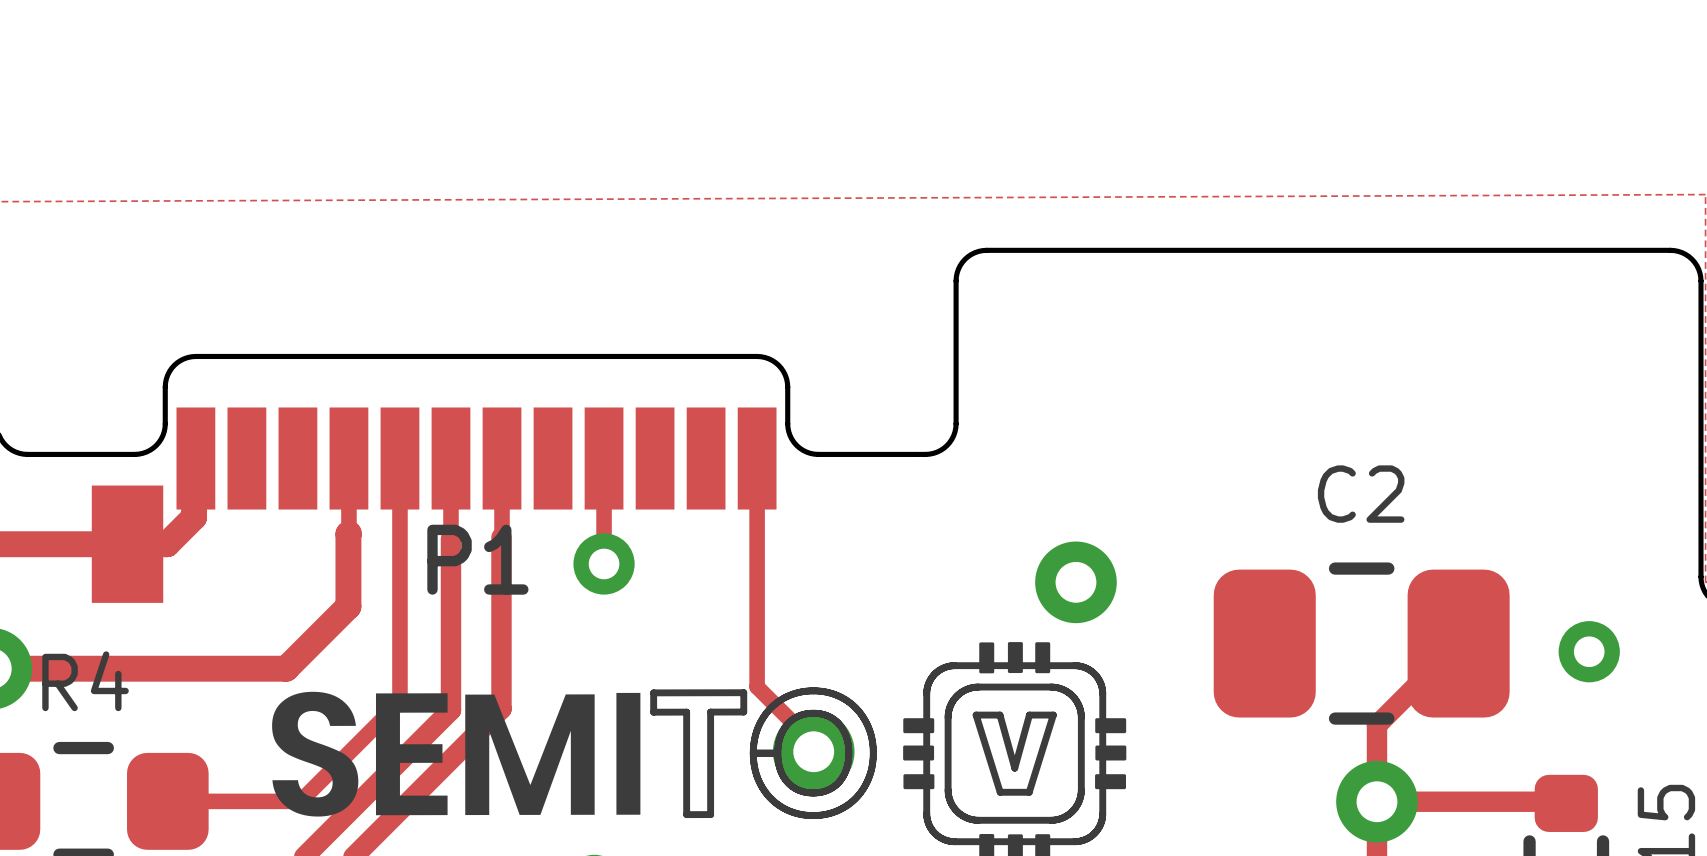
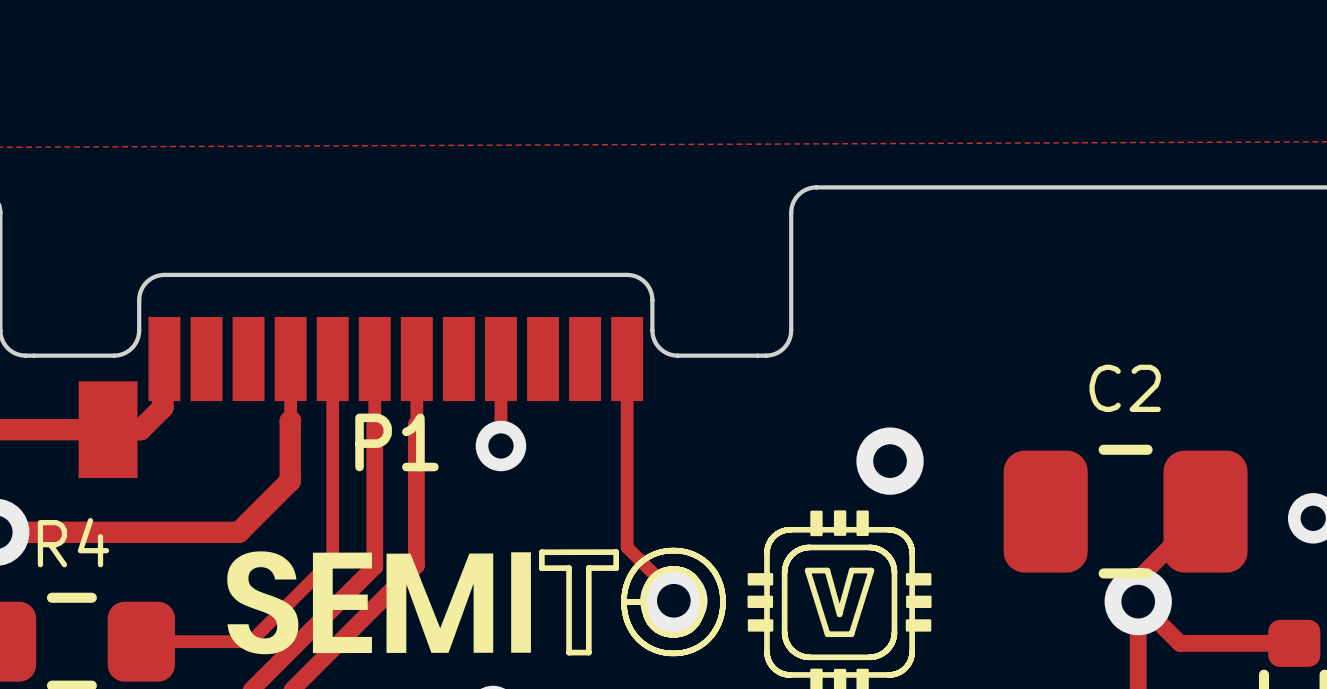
track: (1376, 801) (1564, 801) (1566, 803) -> (1138, 601) (1179, 643) (1294, 643)
via position: (1376, 801) -> (1138, 601)

